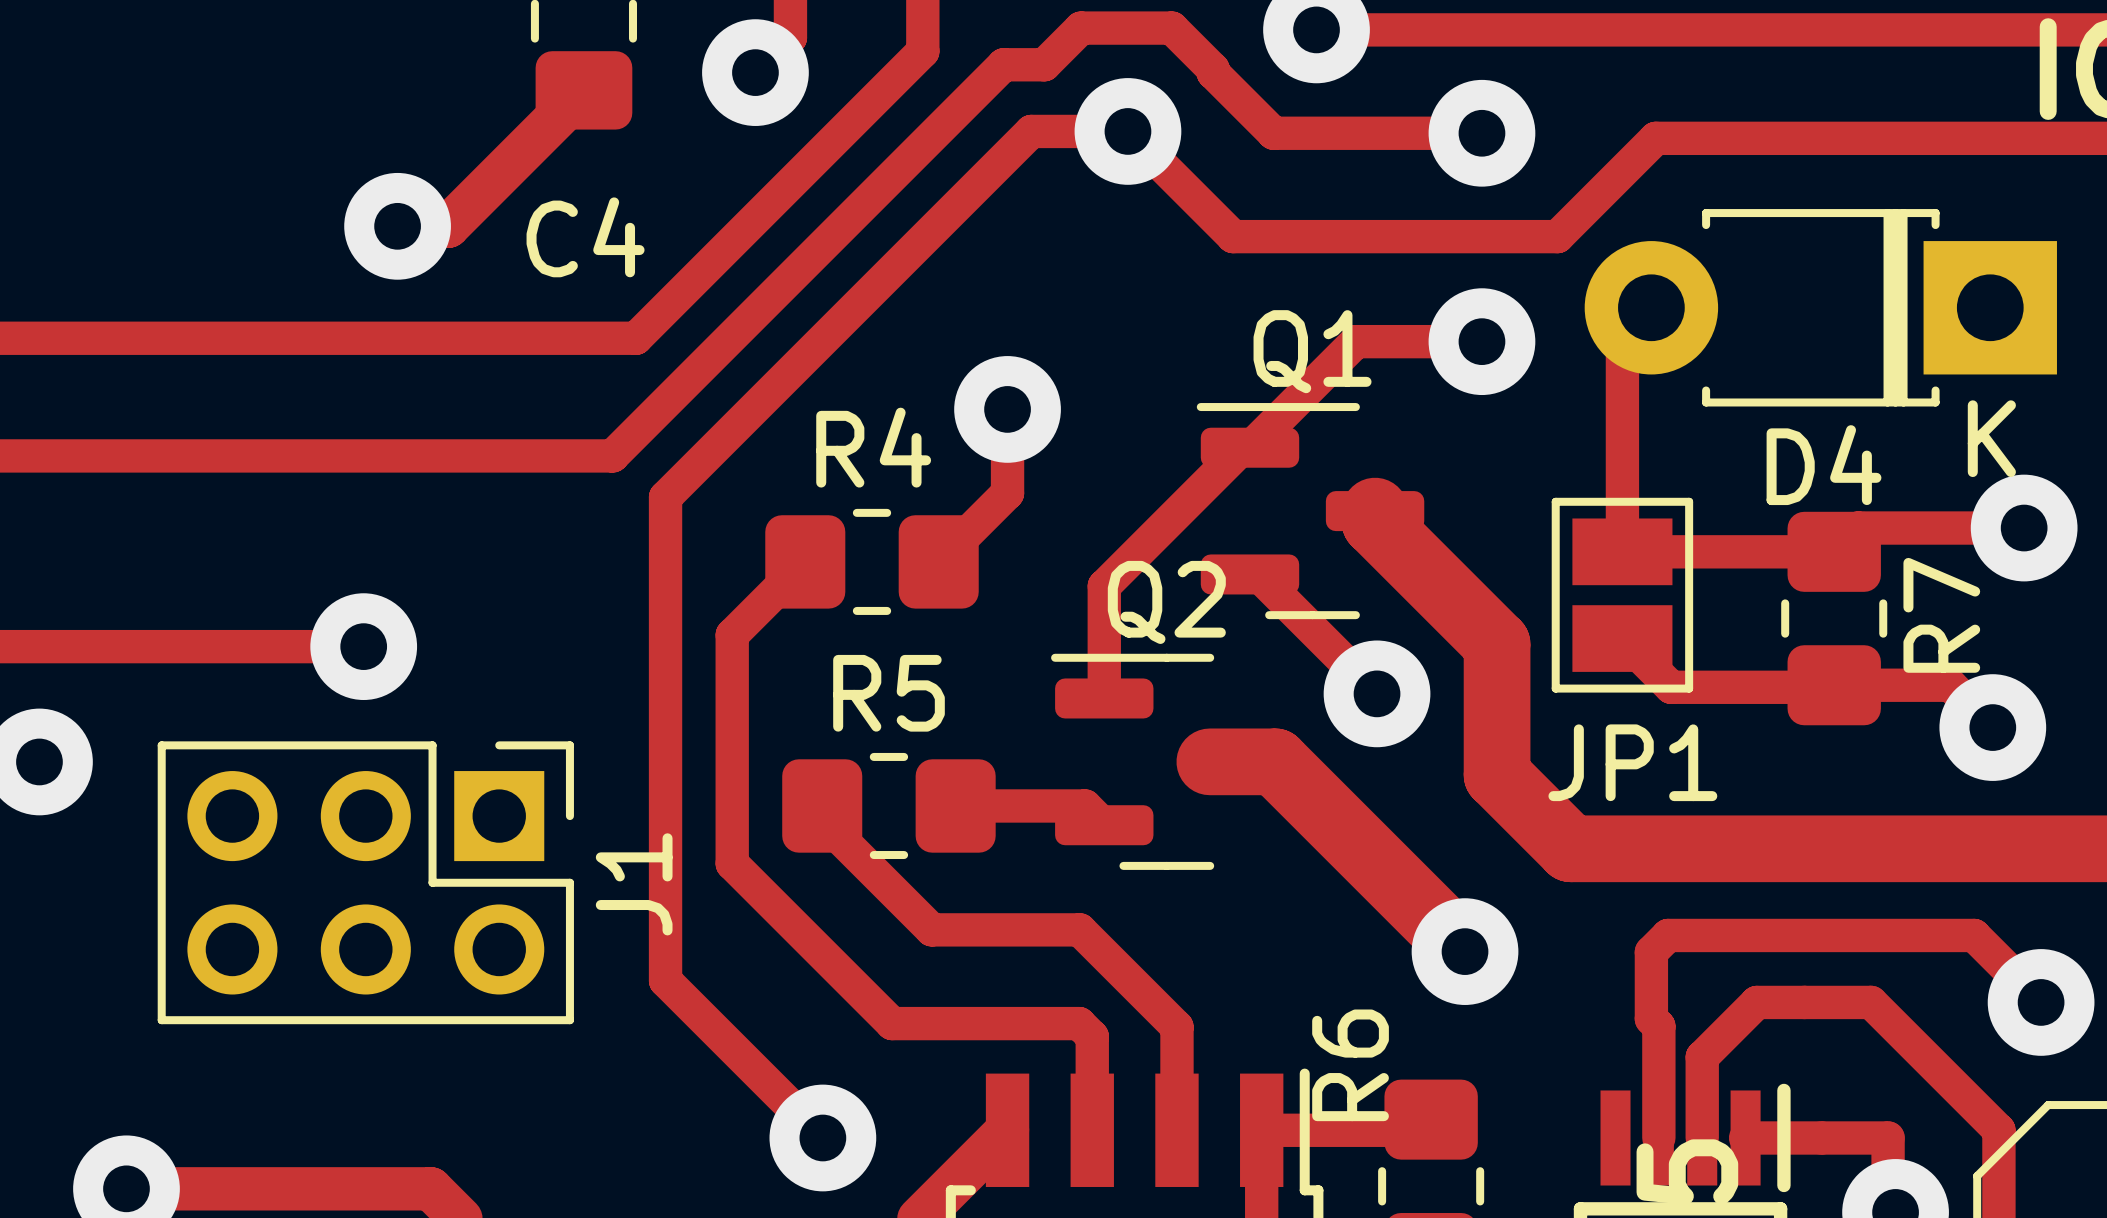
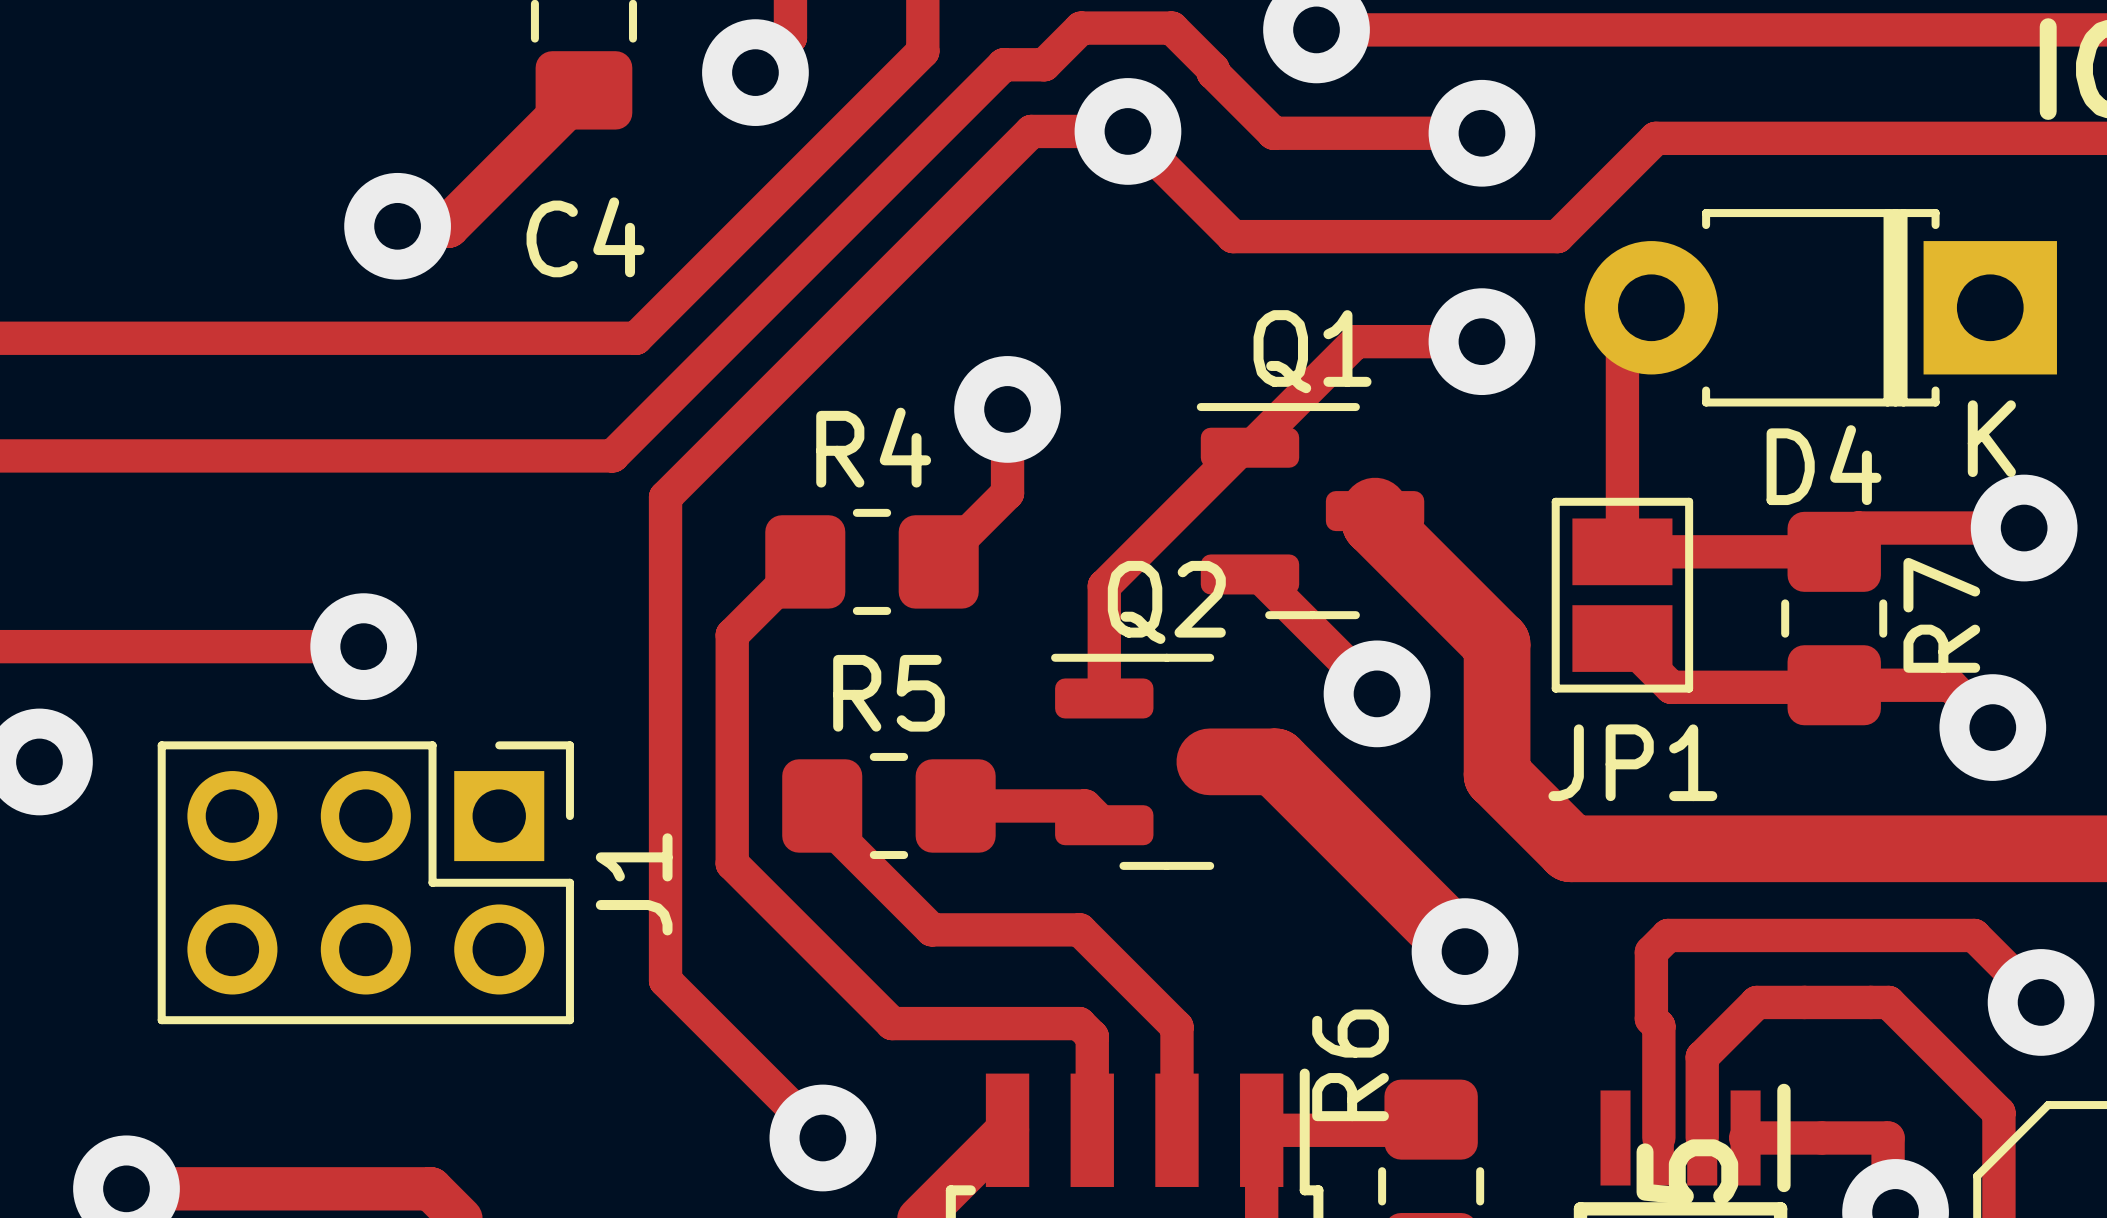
track: (1871, 1002) (1998, 1130) -> (1871, 1002) (1888, 1002) (1998, 1112) (1998, 1130)

